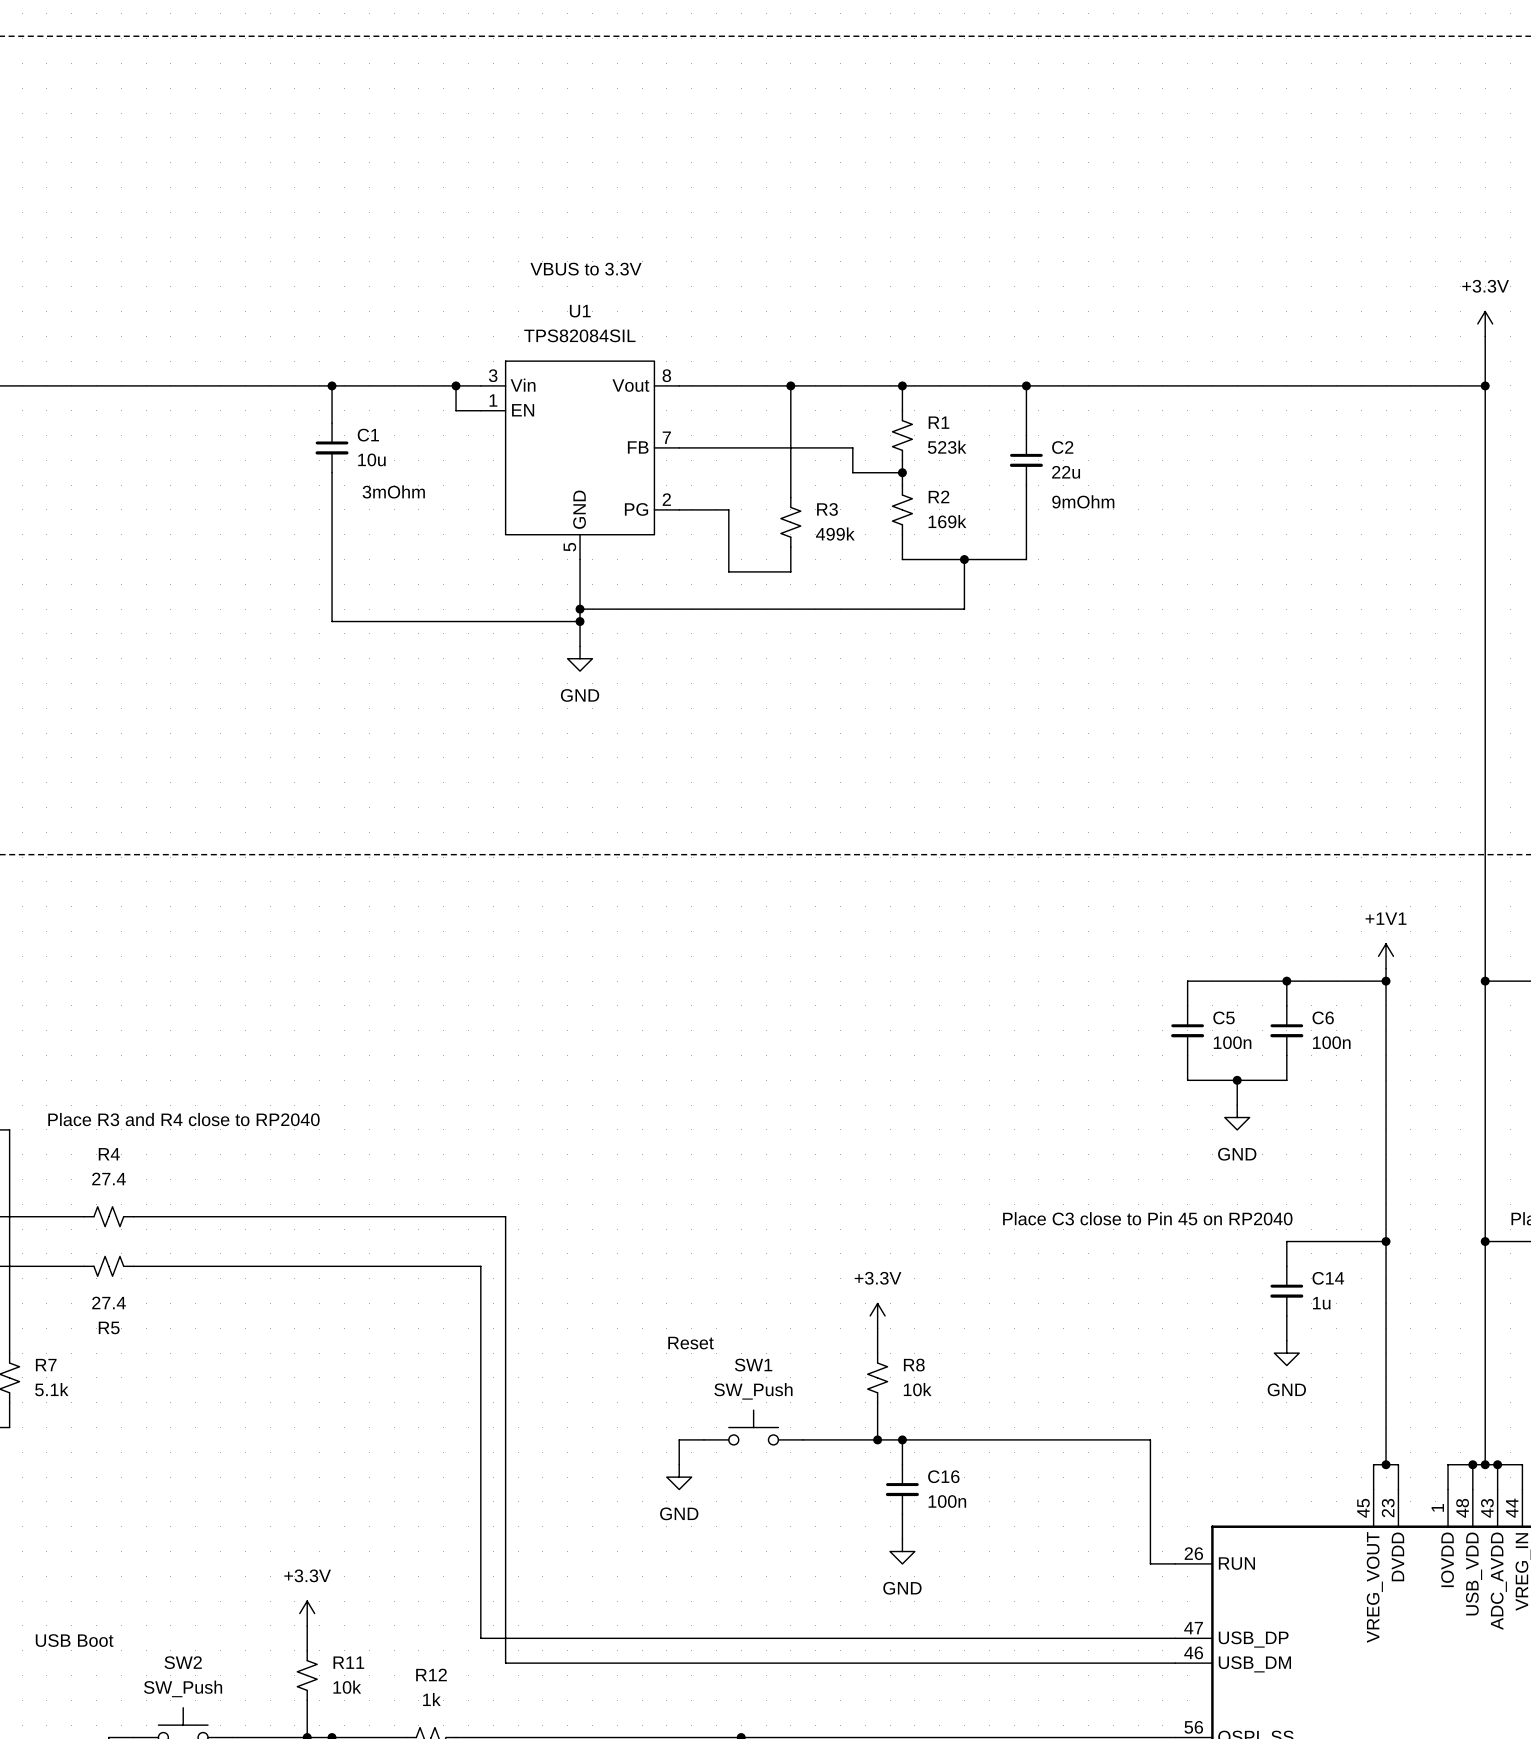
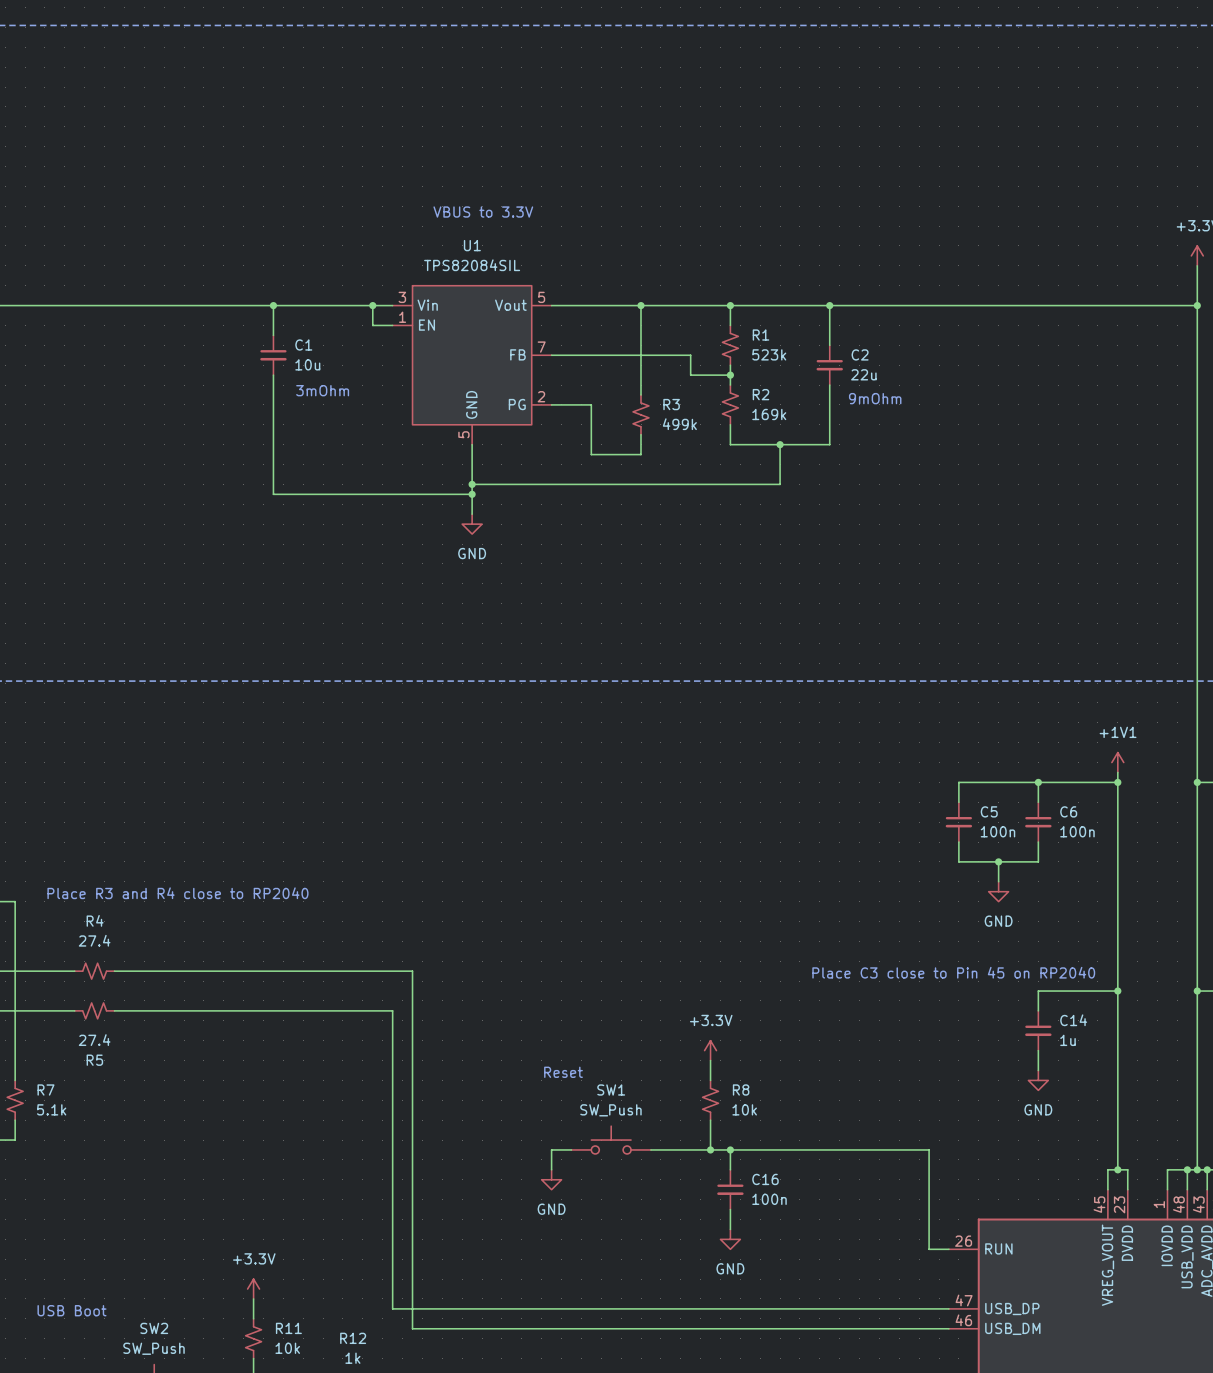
U1 pin number: 8 (666, 375) -> 5 (541, 297)

